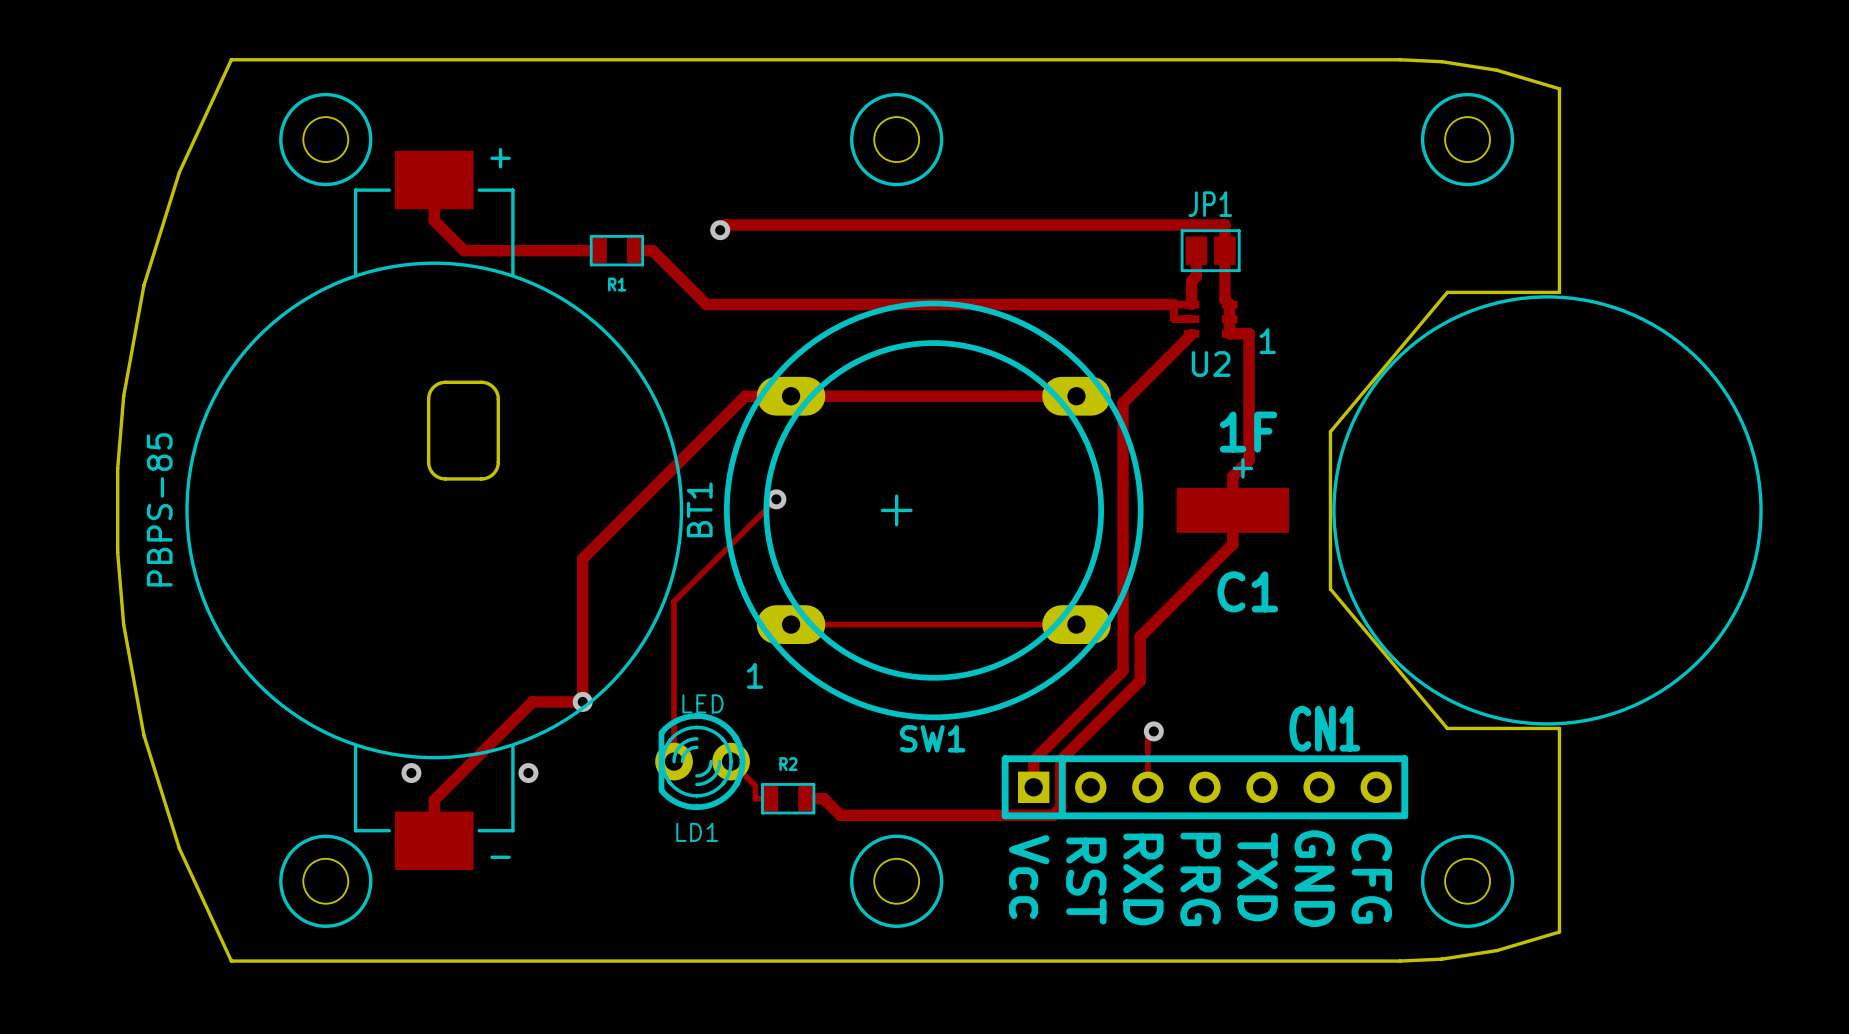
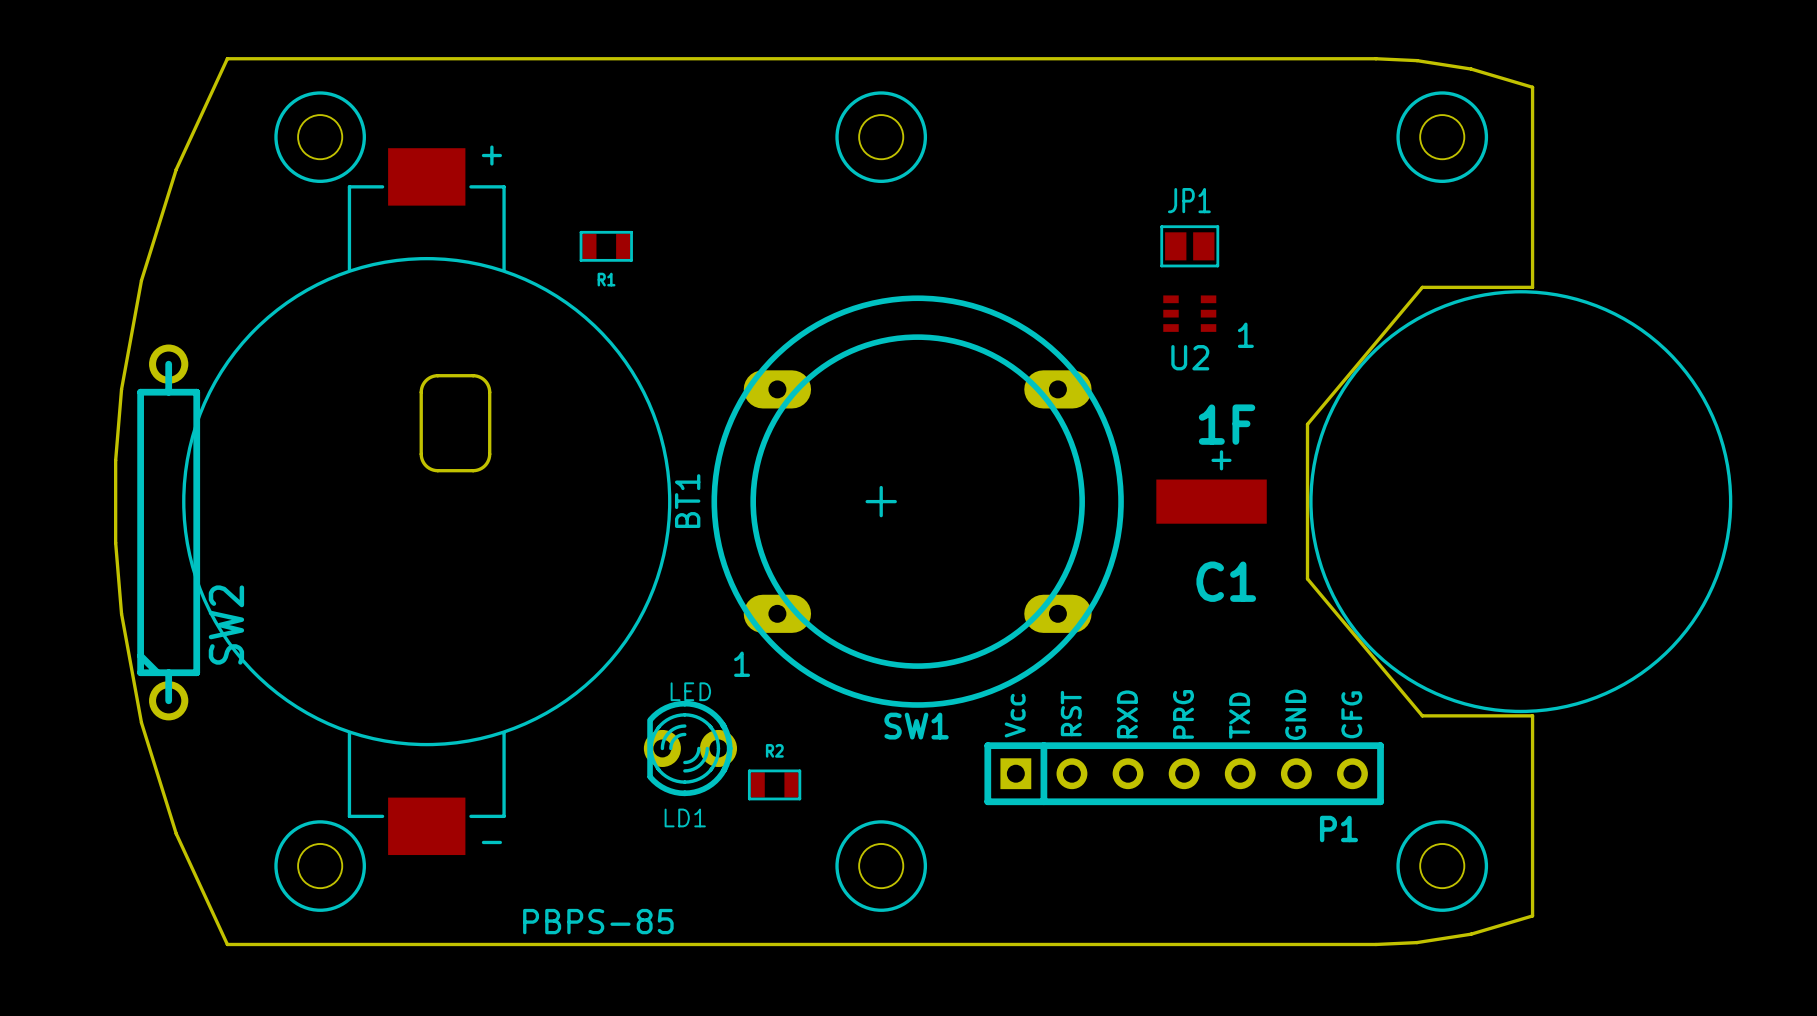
track: (434, 180) (434, 220) (464, 250) (599, 250) -> none
track: (720, 230) (725, 224) (1224, 224) (1224, 299) (1229, 304) (1229, 333) (1249, 333) (1249, 460) (1232, 476) (1232, 544) (1140, 636) (1140, 680) (1060, 760) (1060, 807) (1053, 815) (840, 815) (823, 798) (805, 798) -> none
via: (720, 230) -> none
track: (634, 250) (652, 250) (706, 304) (1174, 304) -> none
track: (1196, 250) (1196, 276) (1191, 281) (1191, 304) (1174, 304) -> none
track: (1174, 304) (1174, 319) (1191, 319) -> none
track: (1191, 333) (1123, 403) (1123, 670) (1033, 760) (1033, 787) -> none
track: (1076, 396) (745, 396) (582, 558) (582, 701) (532, 701) (434, 800) (434, 840) -> none
track: (776, 499) (674, 601) (674, 761) -> none
via: (776, 499) -> none
PBPS-85 name rotation: 0° (159, 509) -> 90° clockwise (598, 921)
PBPS-85 name position: PBPS-85 (159, 509) -> PBPS-85 (598, 921)
SW2: none -> (168, 532)
track: (791, 624) (1076, 624) -> none
via: (582, 701) -> none
CN1 text: none -> RST (1071, 713)
CN1 text: none -> RXD (1127, 714)
CN1 text: none -> PRG (1183, 714)
CN1 text: none -> GND (1295, 714)
CN1 text: none -> CFG (1351, 714)
CN1 text: none -> Vcc (1015, 715)
CN1 text: none -> TXD (1239, 715)
CN1 name: CN1 (1324, 728) -> P1 (1338, 828)
track: (1153, 731) (1147, 737) (1147, 787) -> none
via: (1153, 731) -> none
track: (731, 761) (755, 785) (755, 798) (771, 798) -> none
via: (411, 773) -> none
via: (528, 773) -> none
text: Vcc (1029, 877) -> none
text: TXD (1257, 877) -> none
text: GND (1314, 878) -> none
text: CFG (1371, 878) -> none
text: RXD (1143, 879) -> none
text: PRG (1200, 879) -> none
text: RST (1086, 881) -> none

